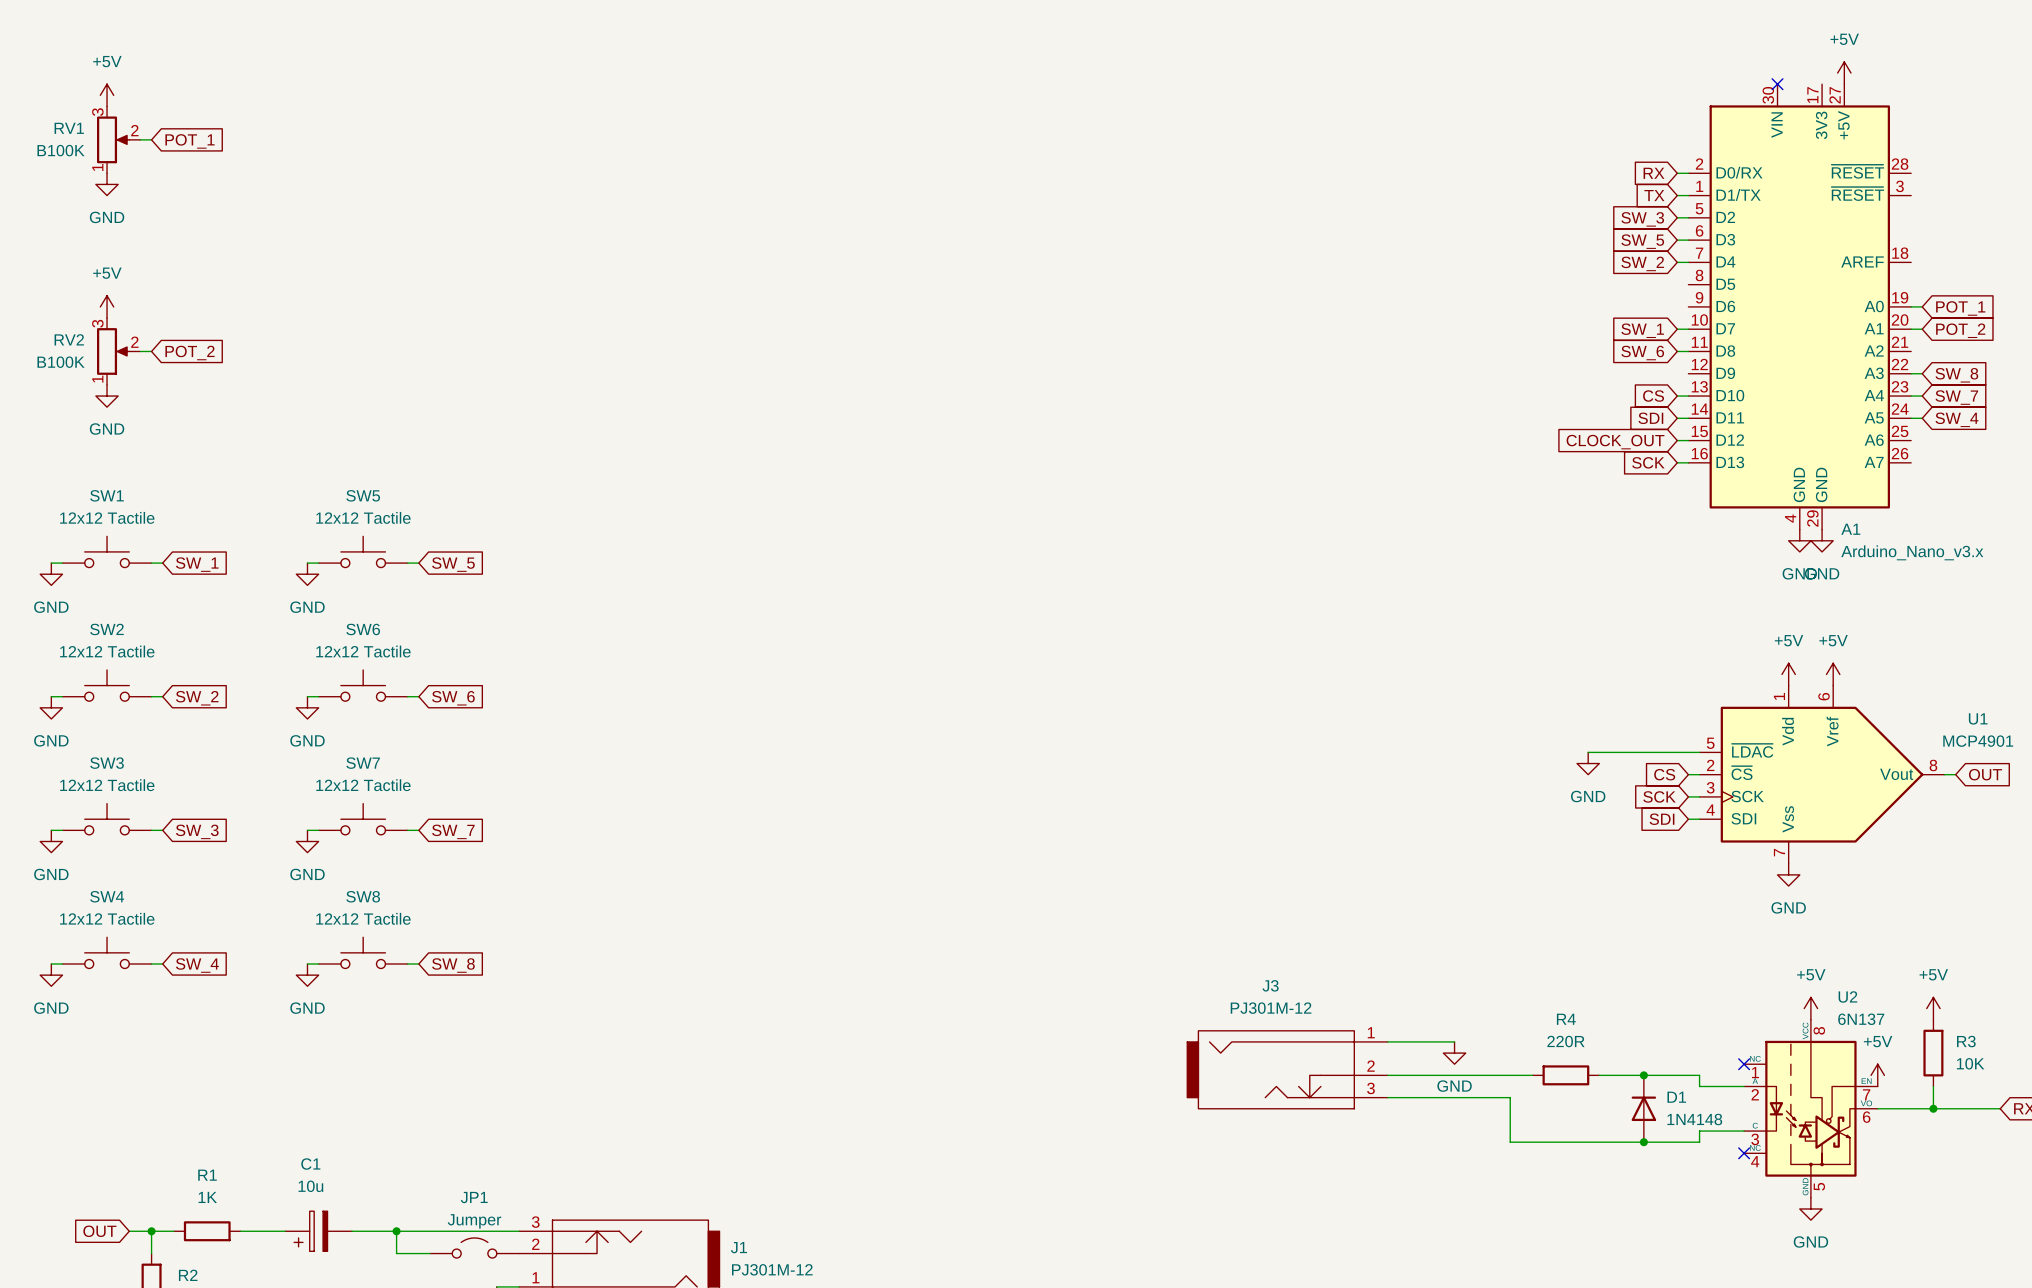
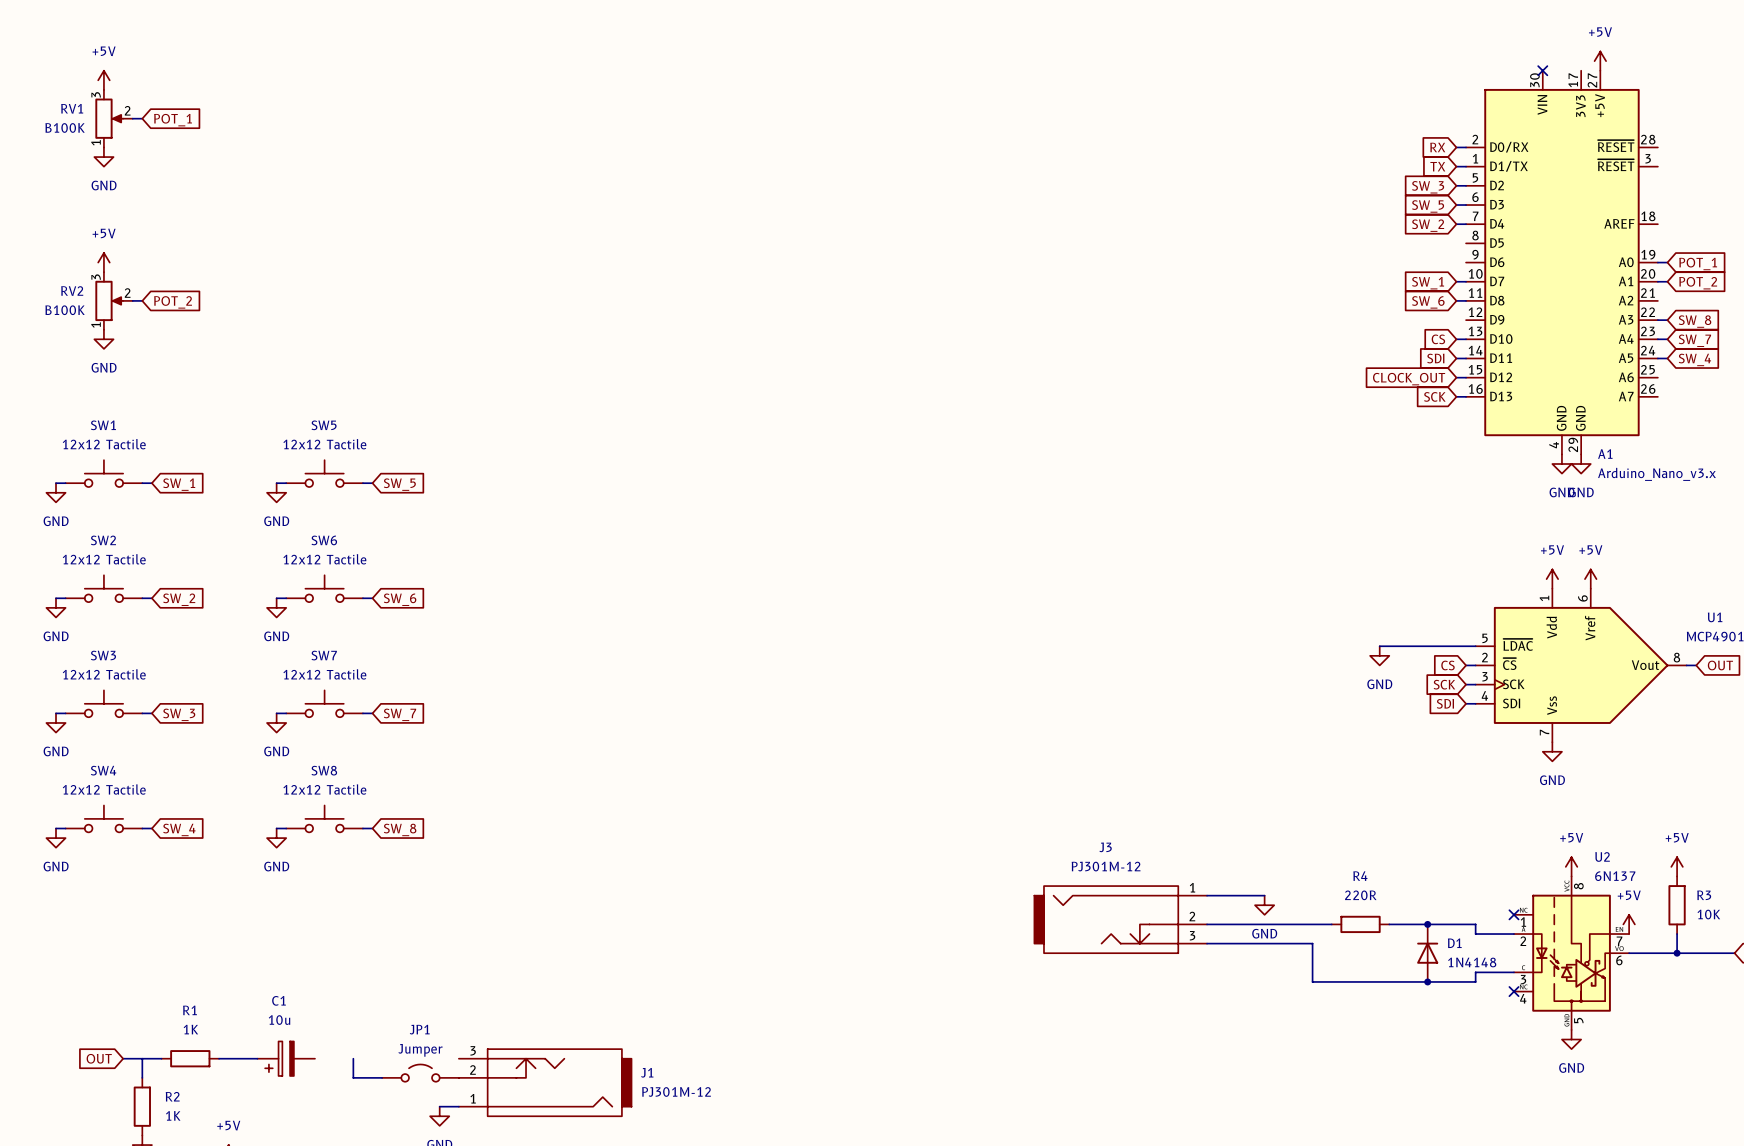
junction: (151, 1231) -> none
wire: (352, 1231) (519, 1231) -> none
junction: (396, 1231) -> none

